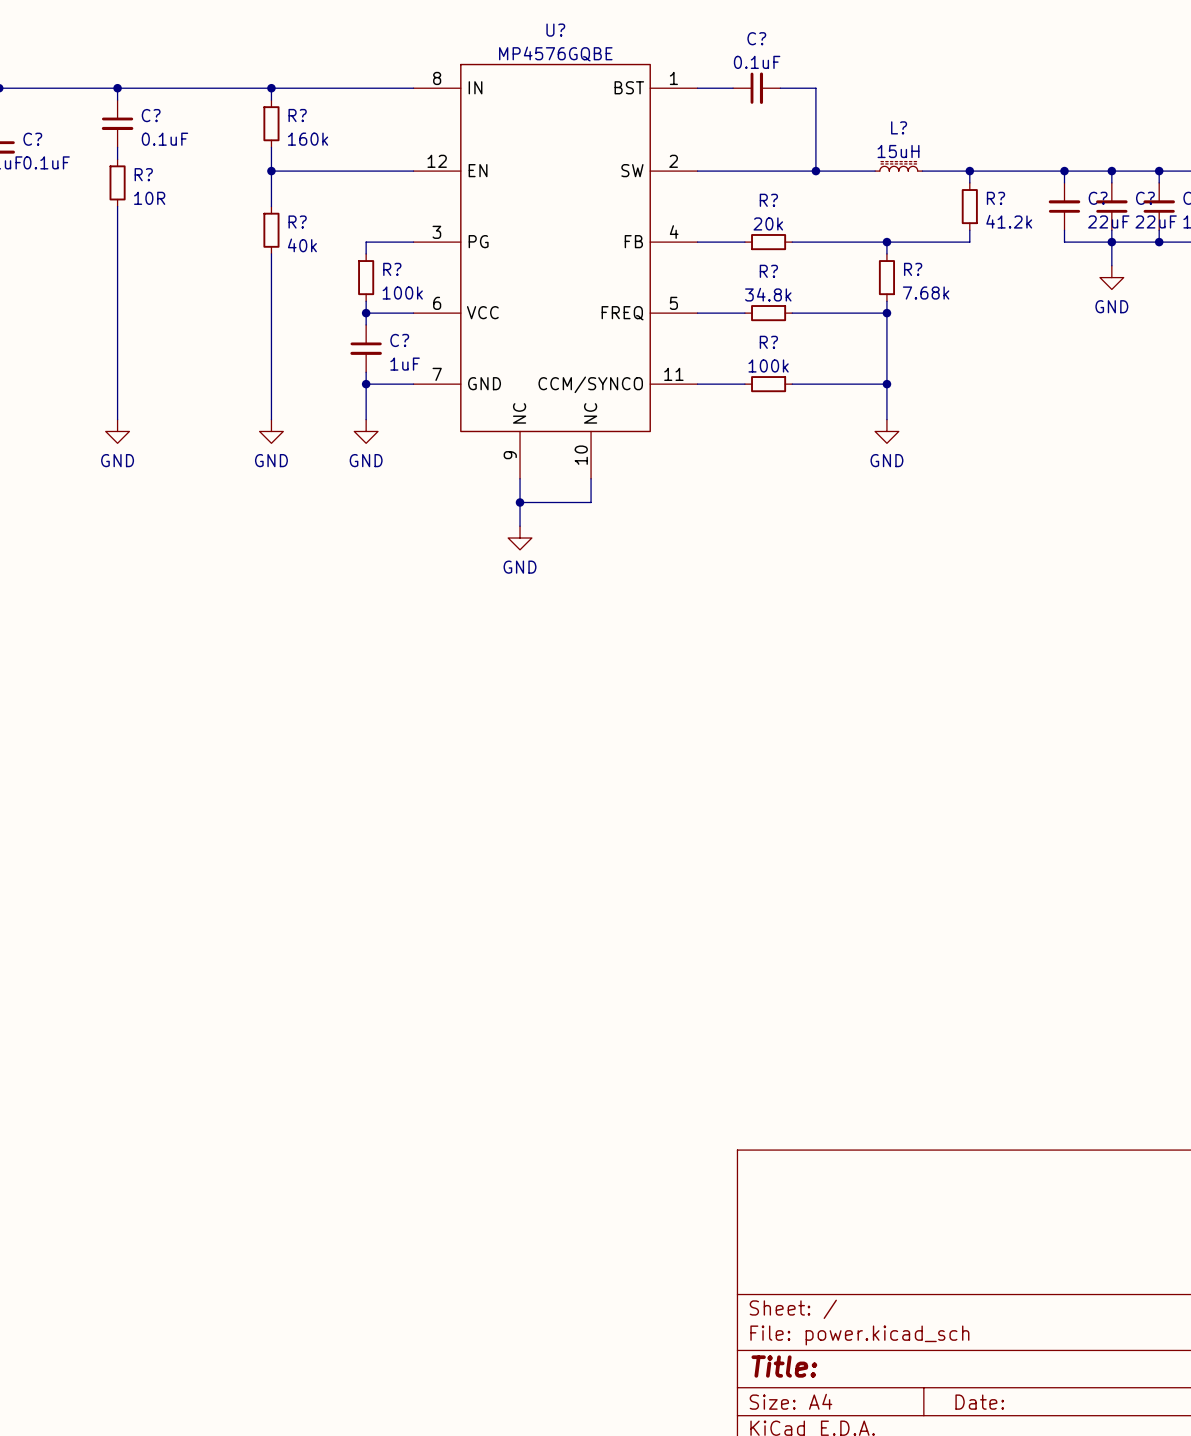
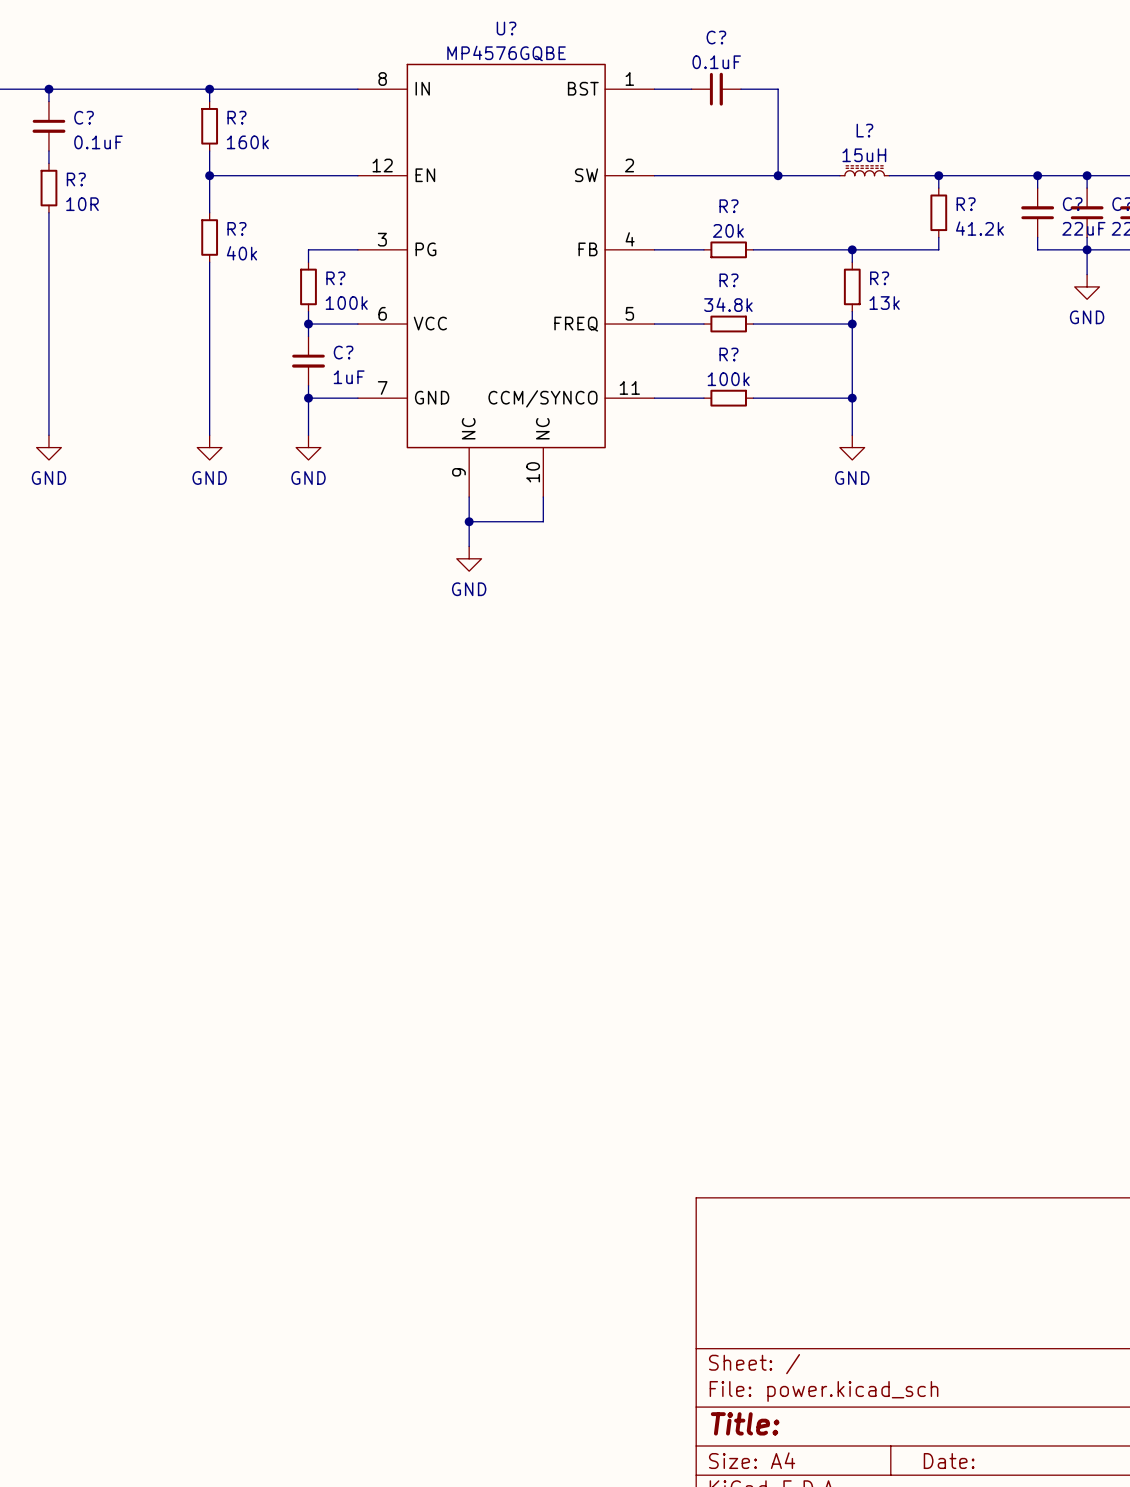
R? value: 7.68k (926, 293) -> 13k (884, 303)

